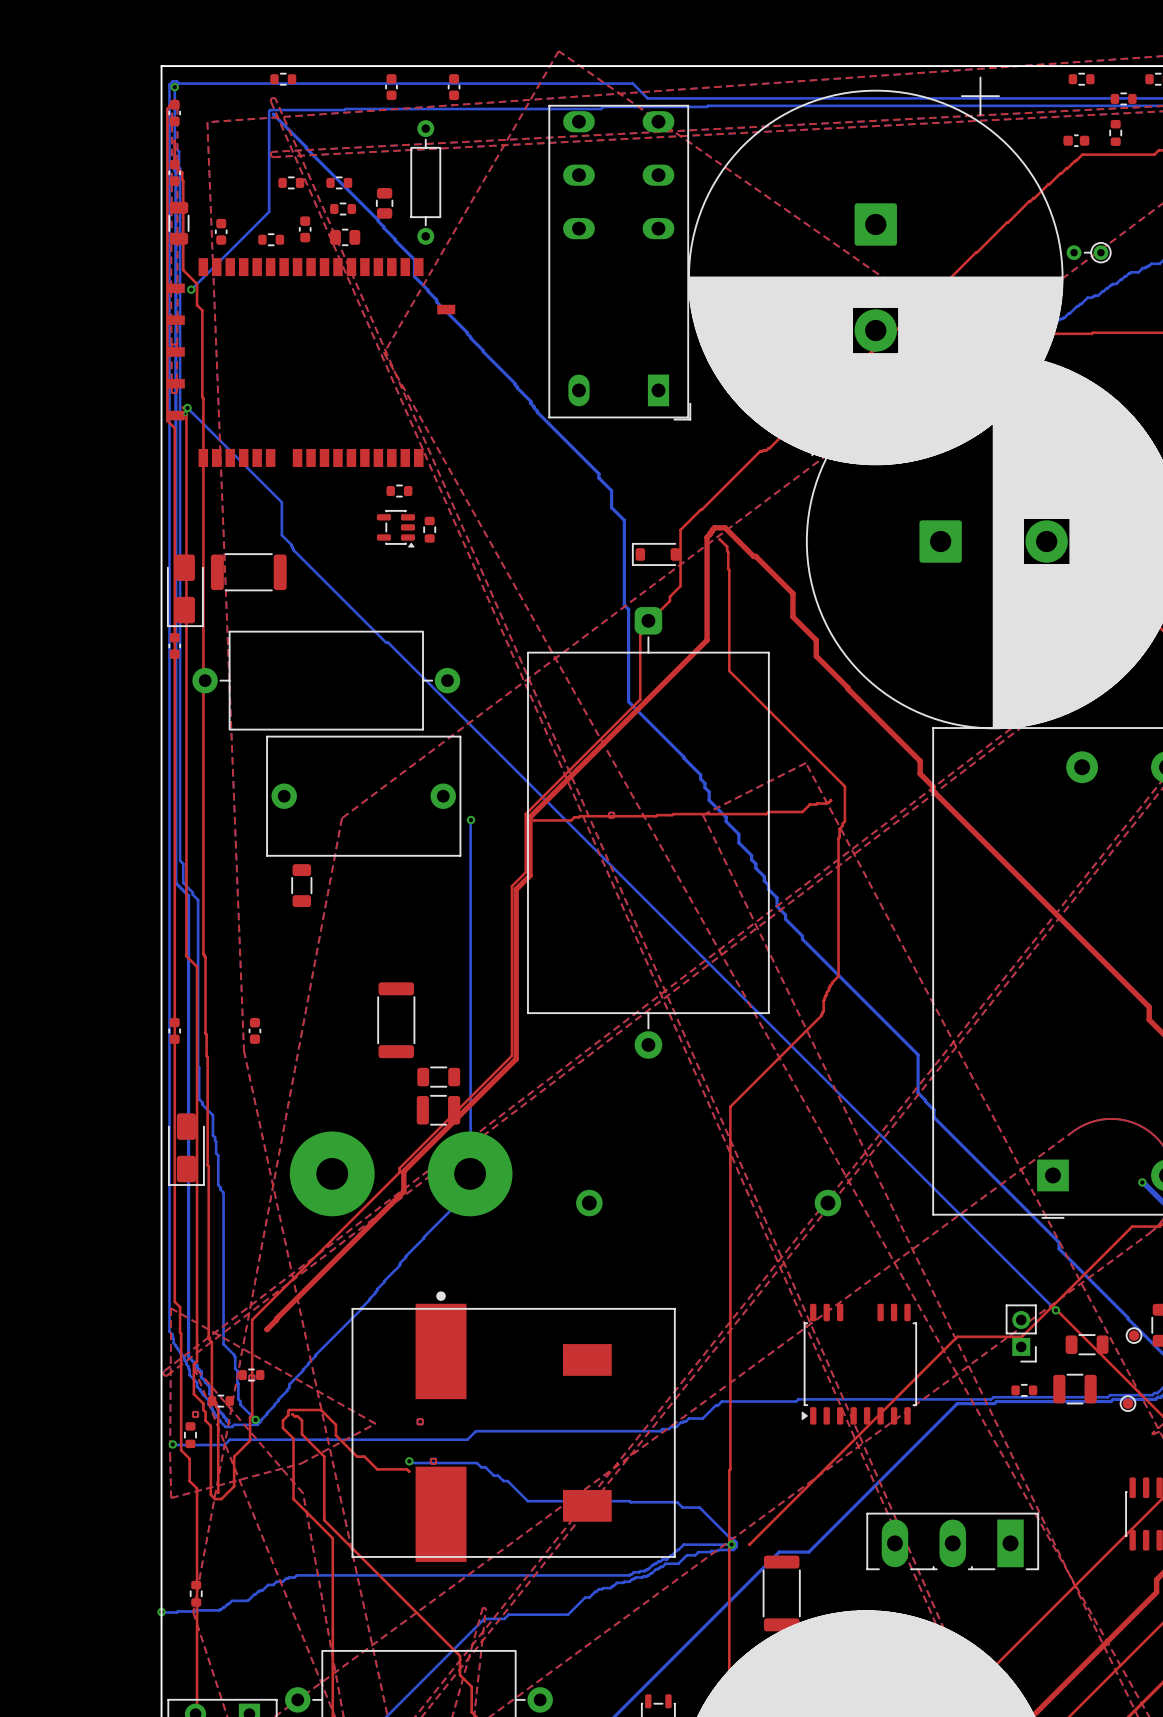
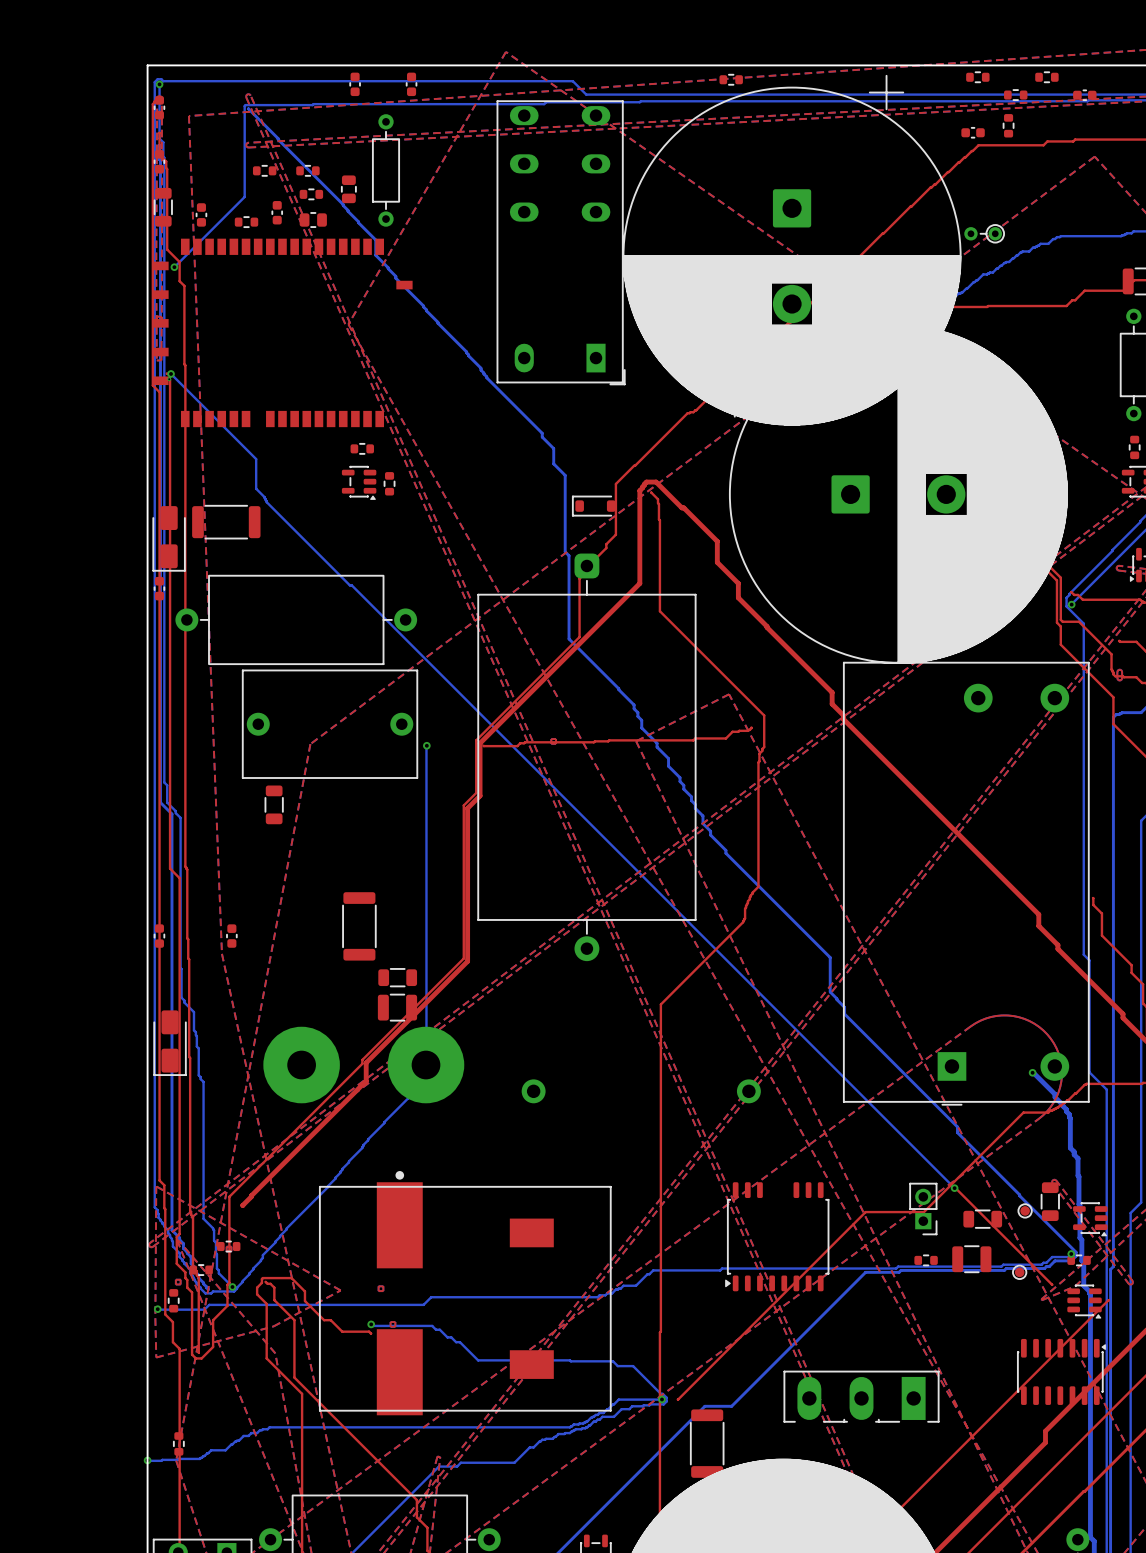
part: (283, 79) -> none
part: none -> (731, 79)

